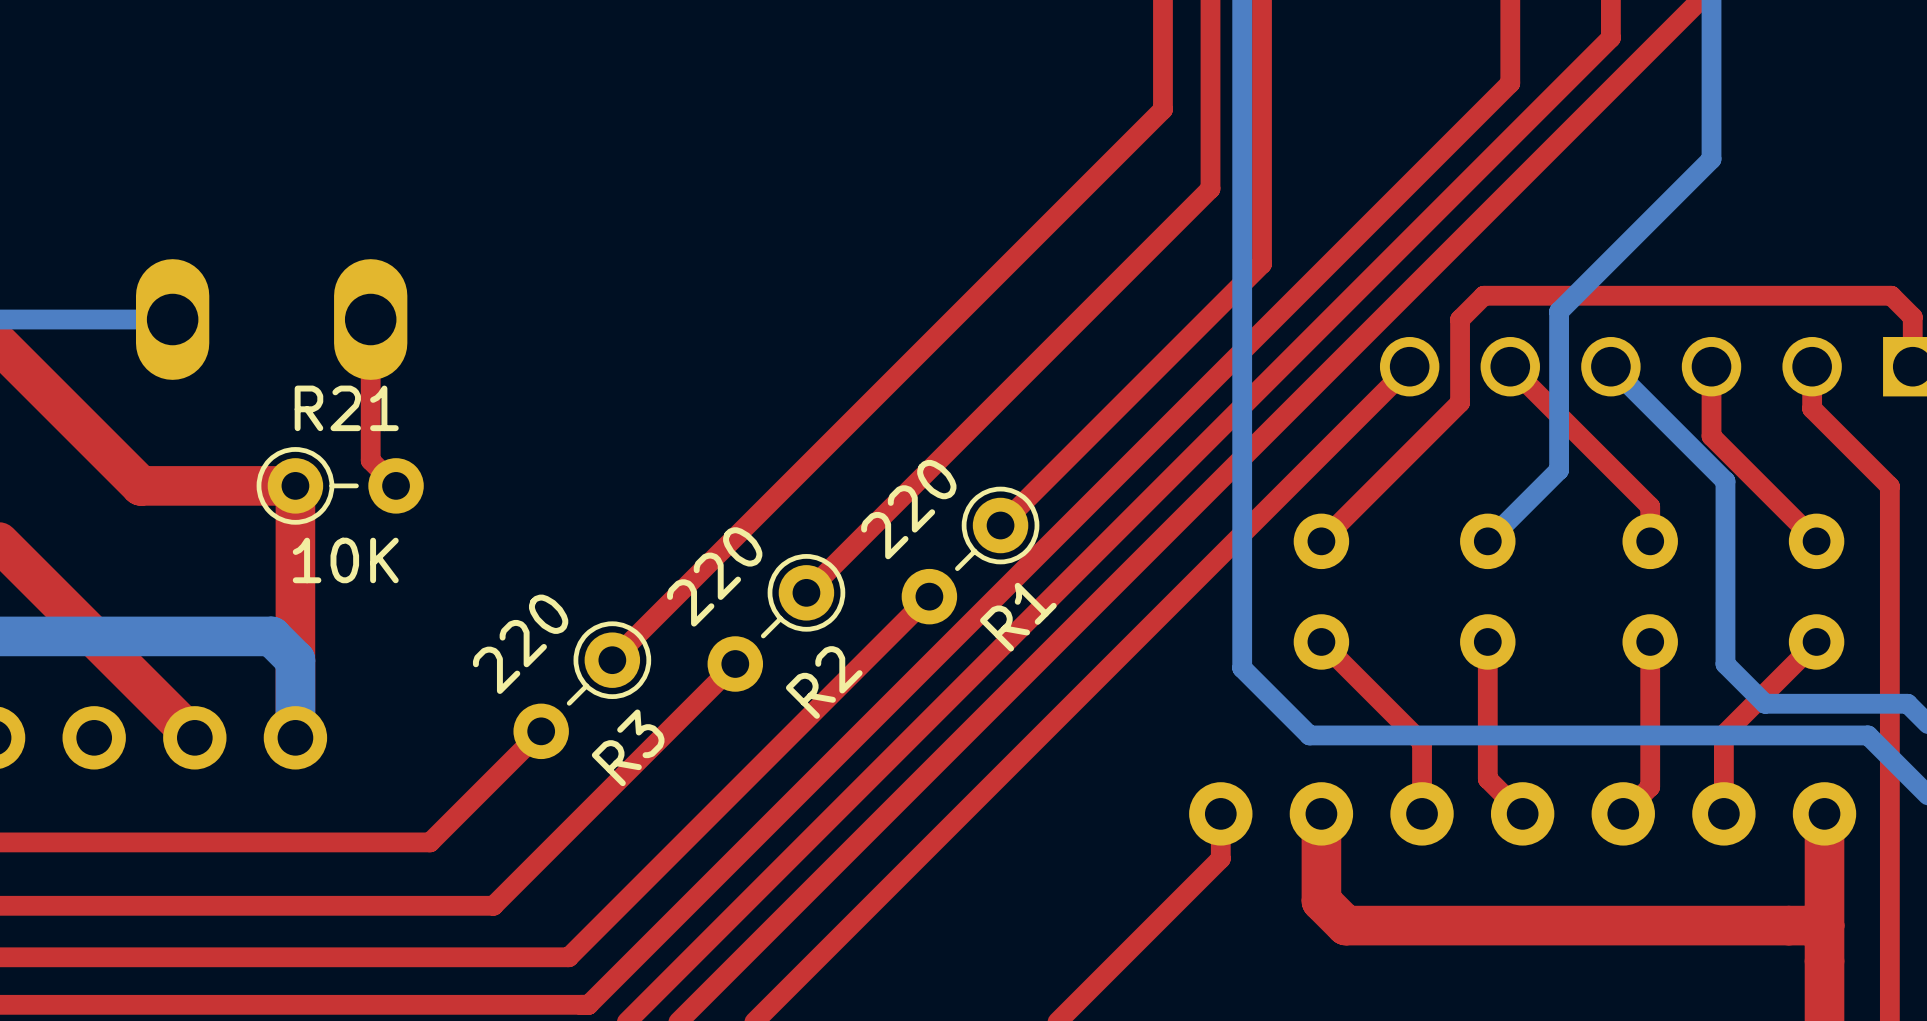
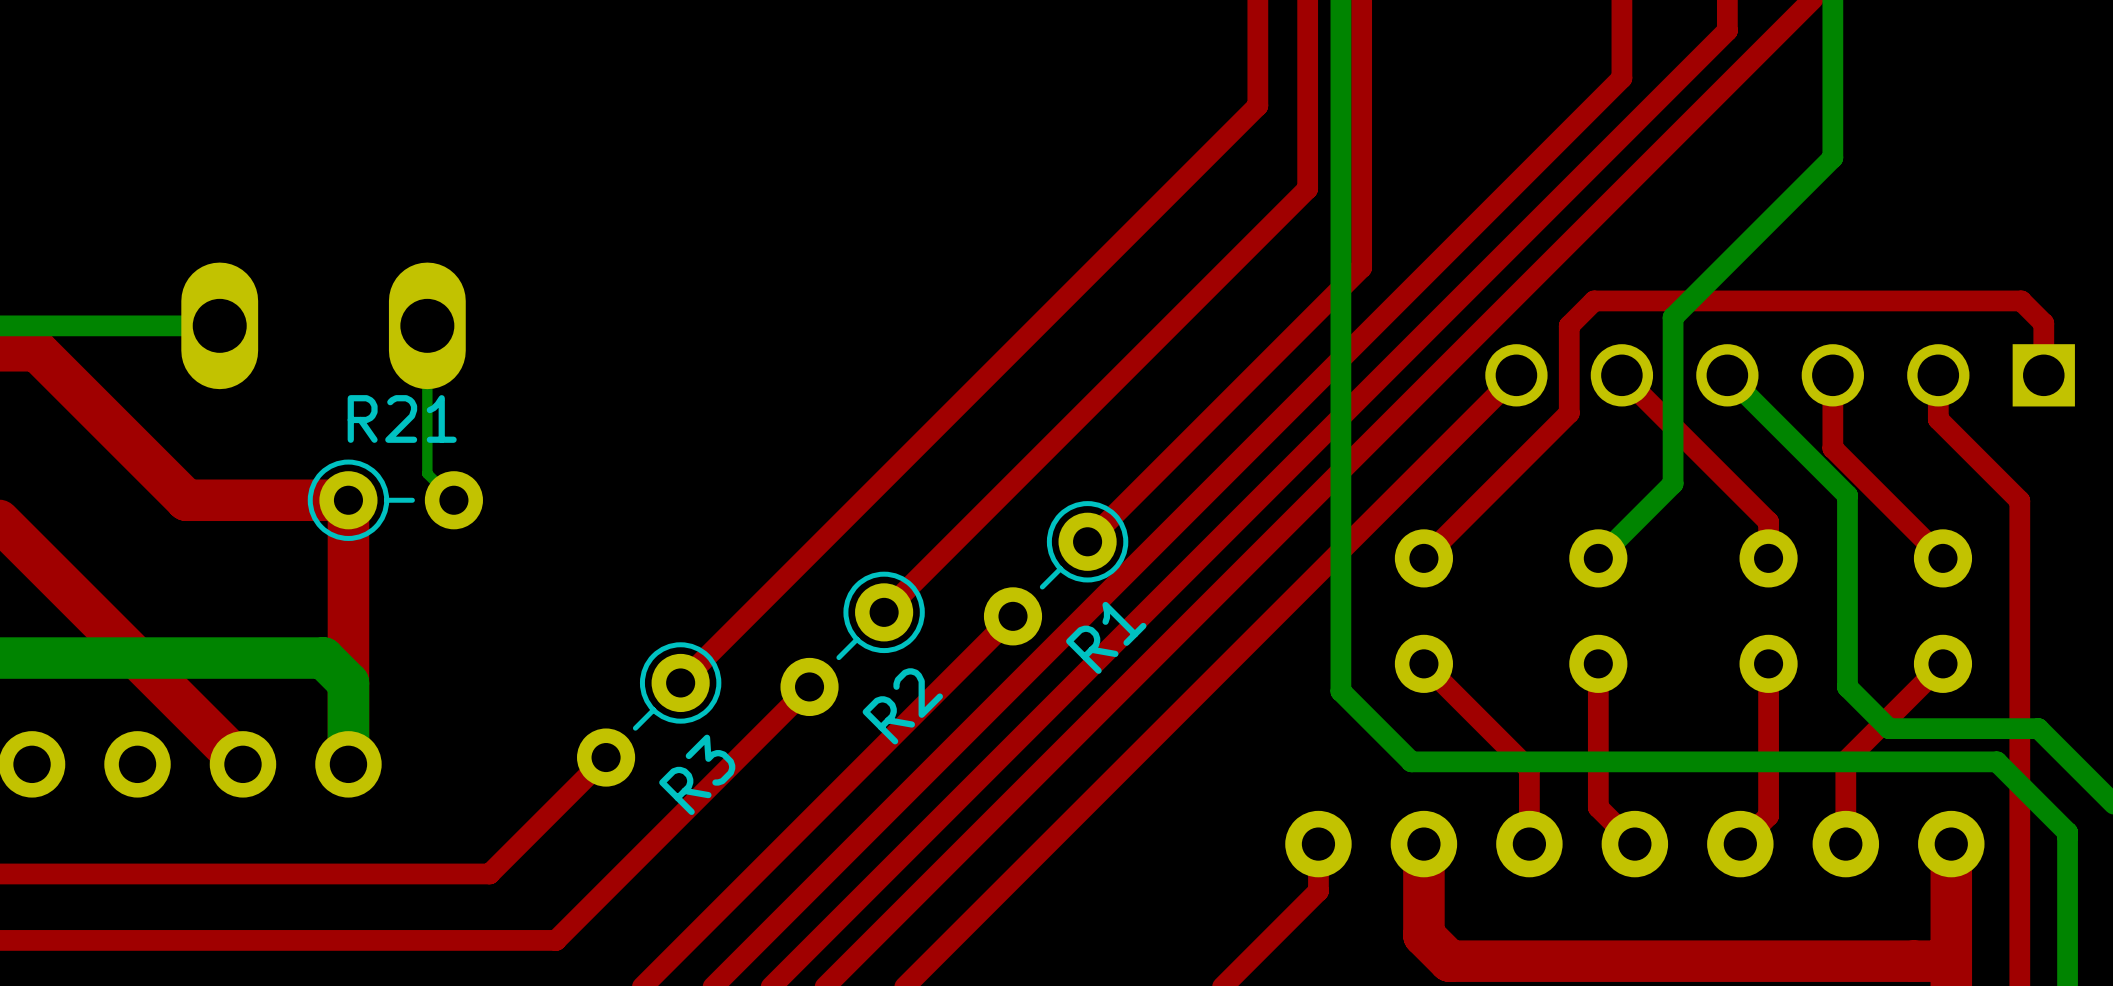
top track: (370, 319) (370, 460) (396, 485) -> none
bottom track: none -> (427, 325) (427, 473) (453, 500)
R1 value: 220 (908, 509) -> none
R21 value: 10K (345, 560) -> none
R2 value: 220 (714, 576) -> none
R3 value: 220 (520, 644) -> none

